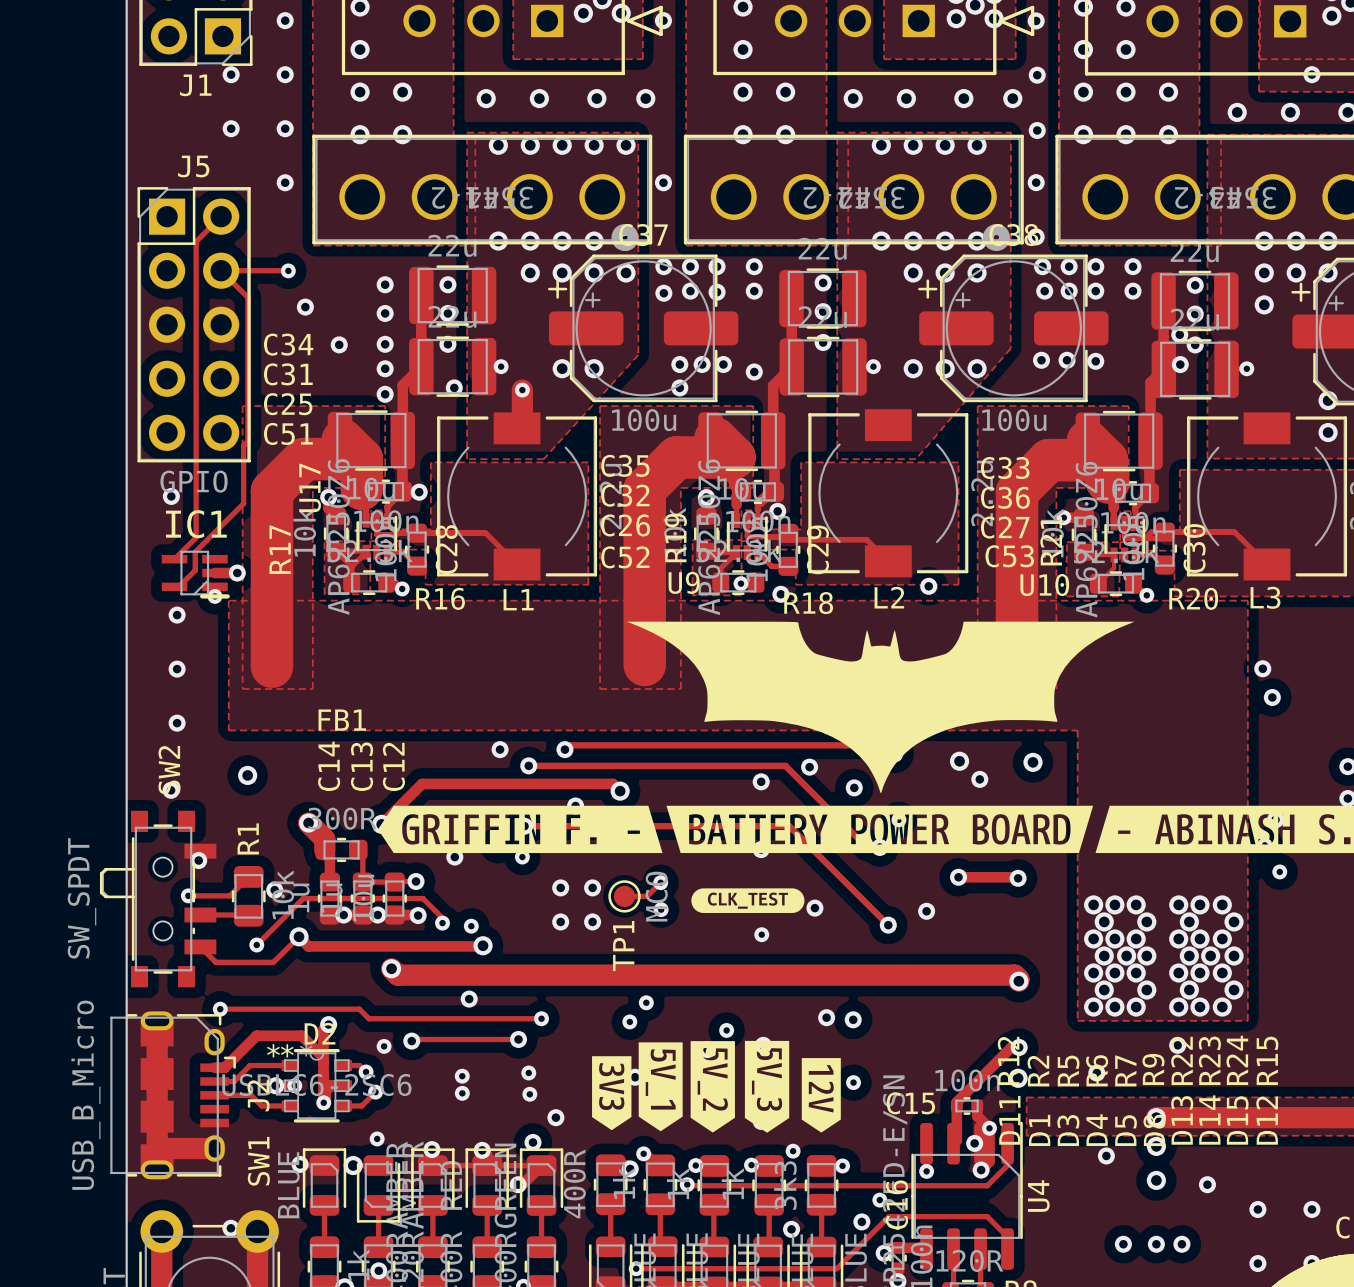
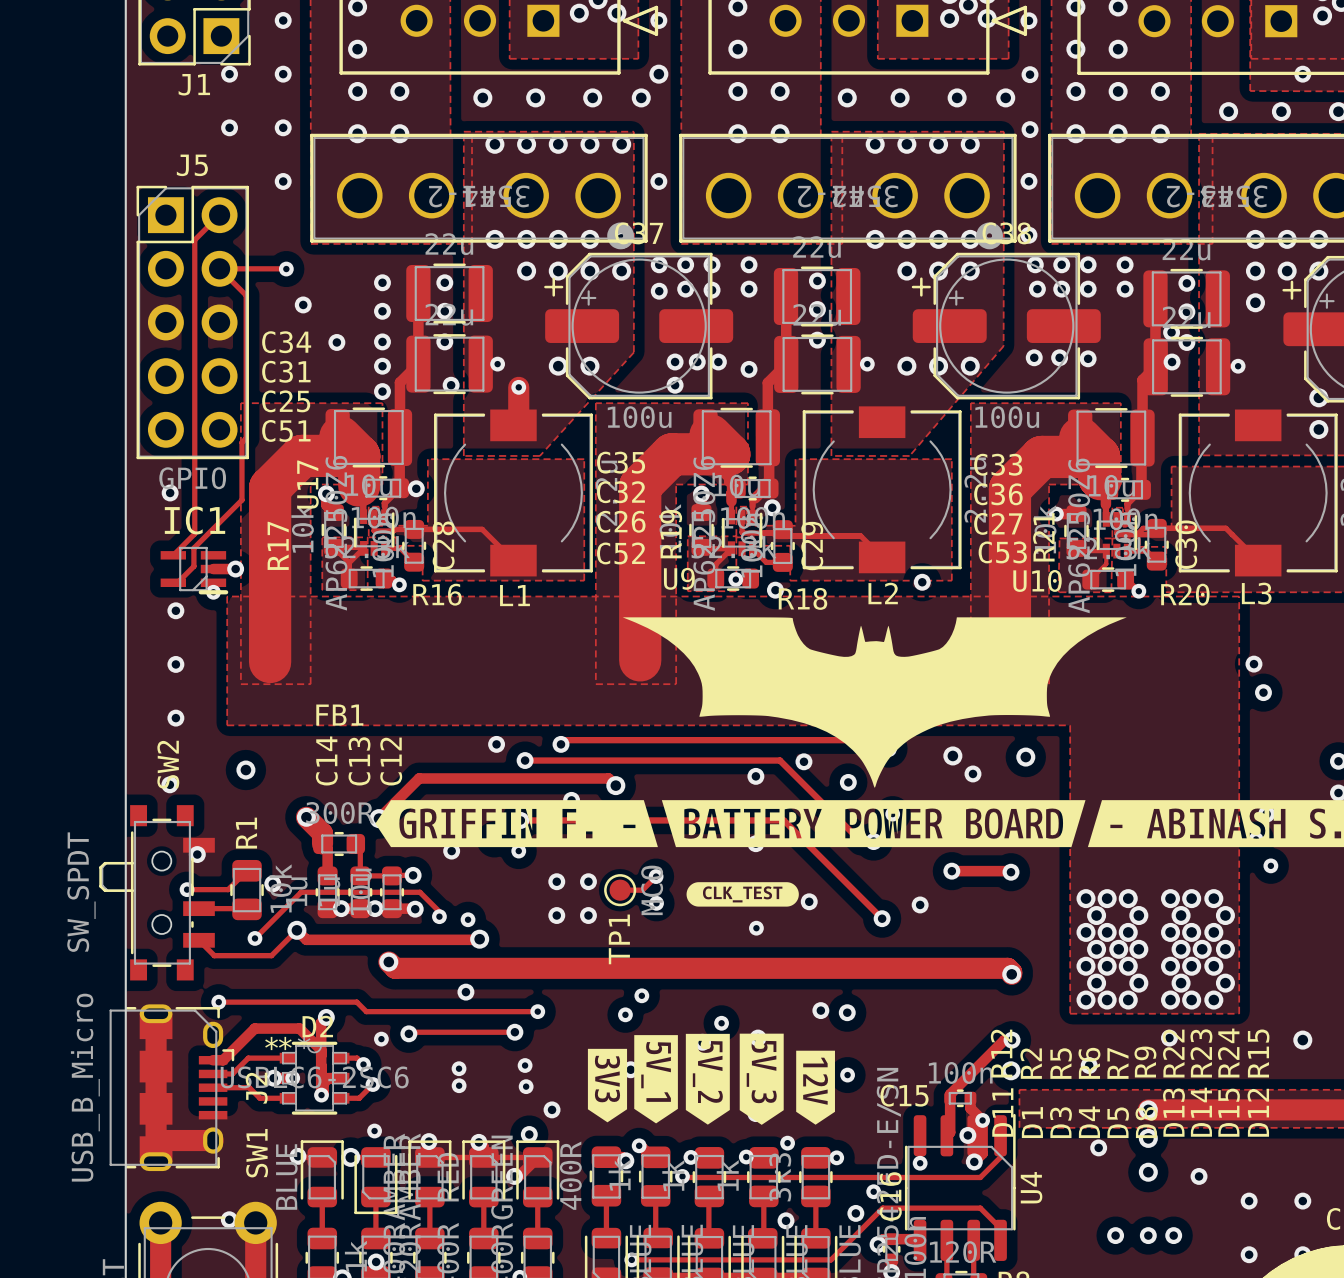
via: none -> (658, 74)
via: none -> (1302, 1040)

